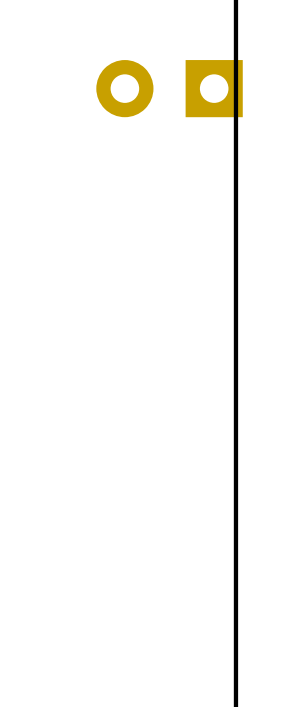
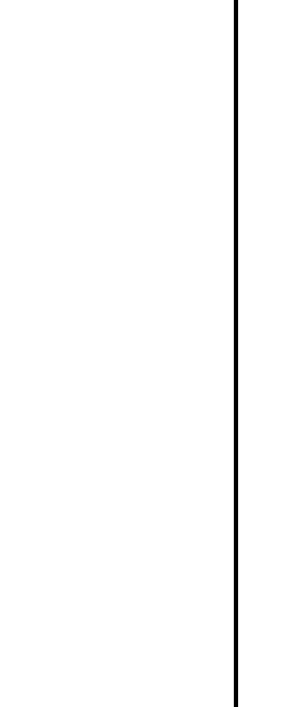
part: (169, 88) -> none

